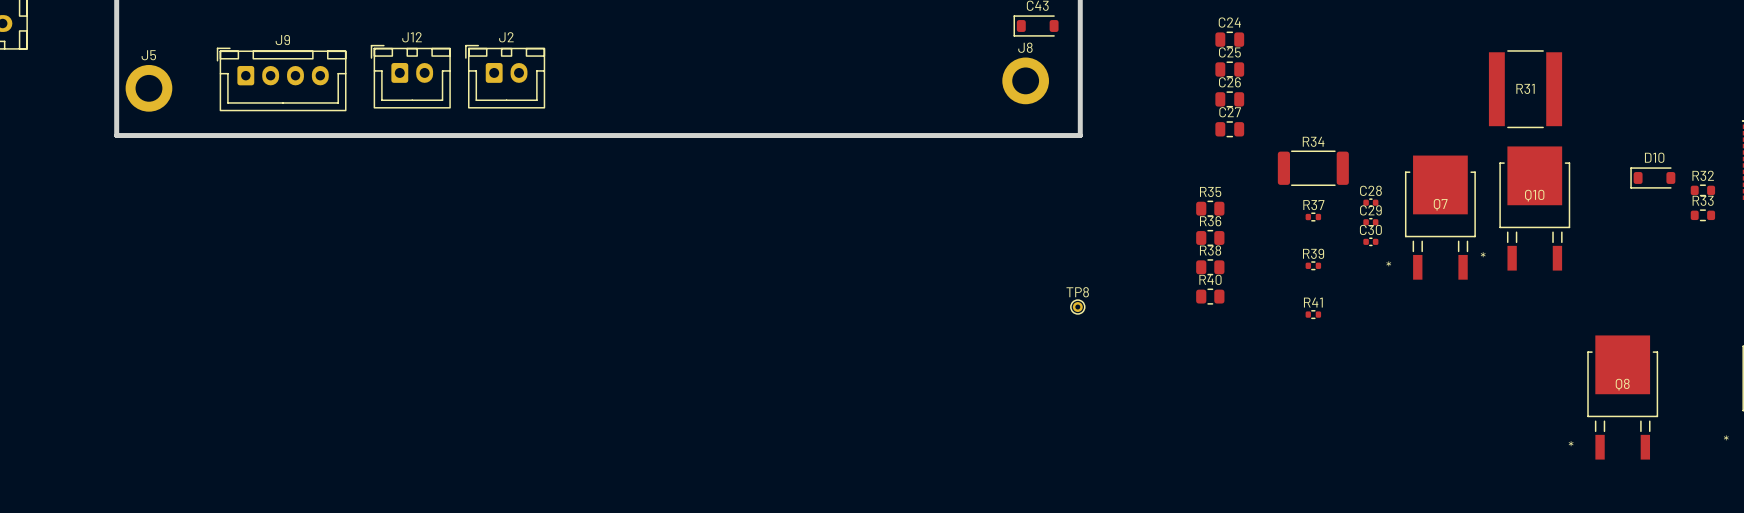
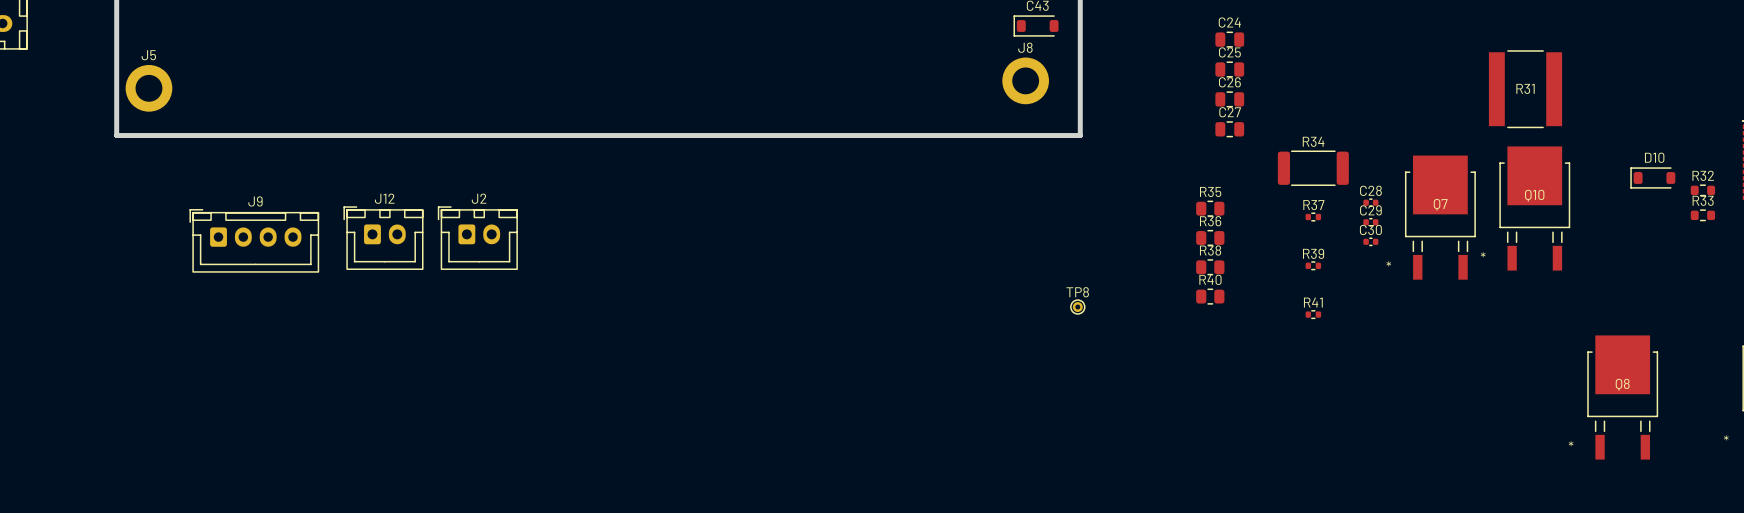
J12 position: (410, 76) -> (383, 238)
J2 position: (505, 76) -> (477, 238)
J9 position: (281, 79) -> (254, 240)

